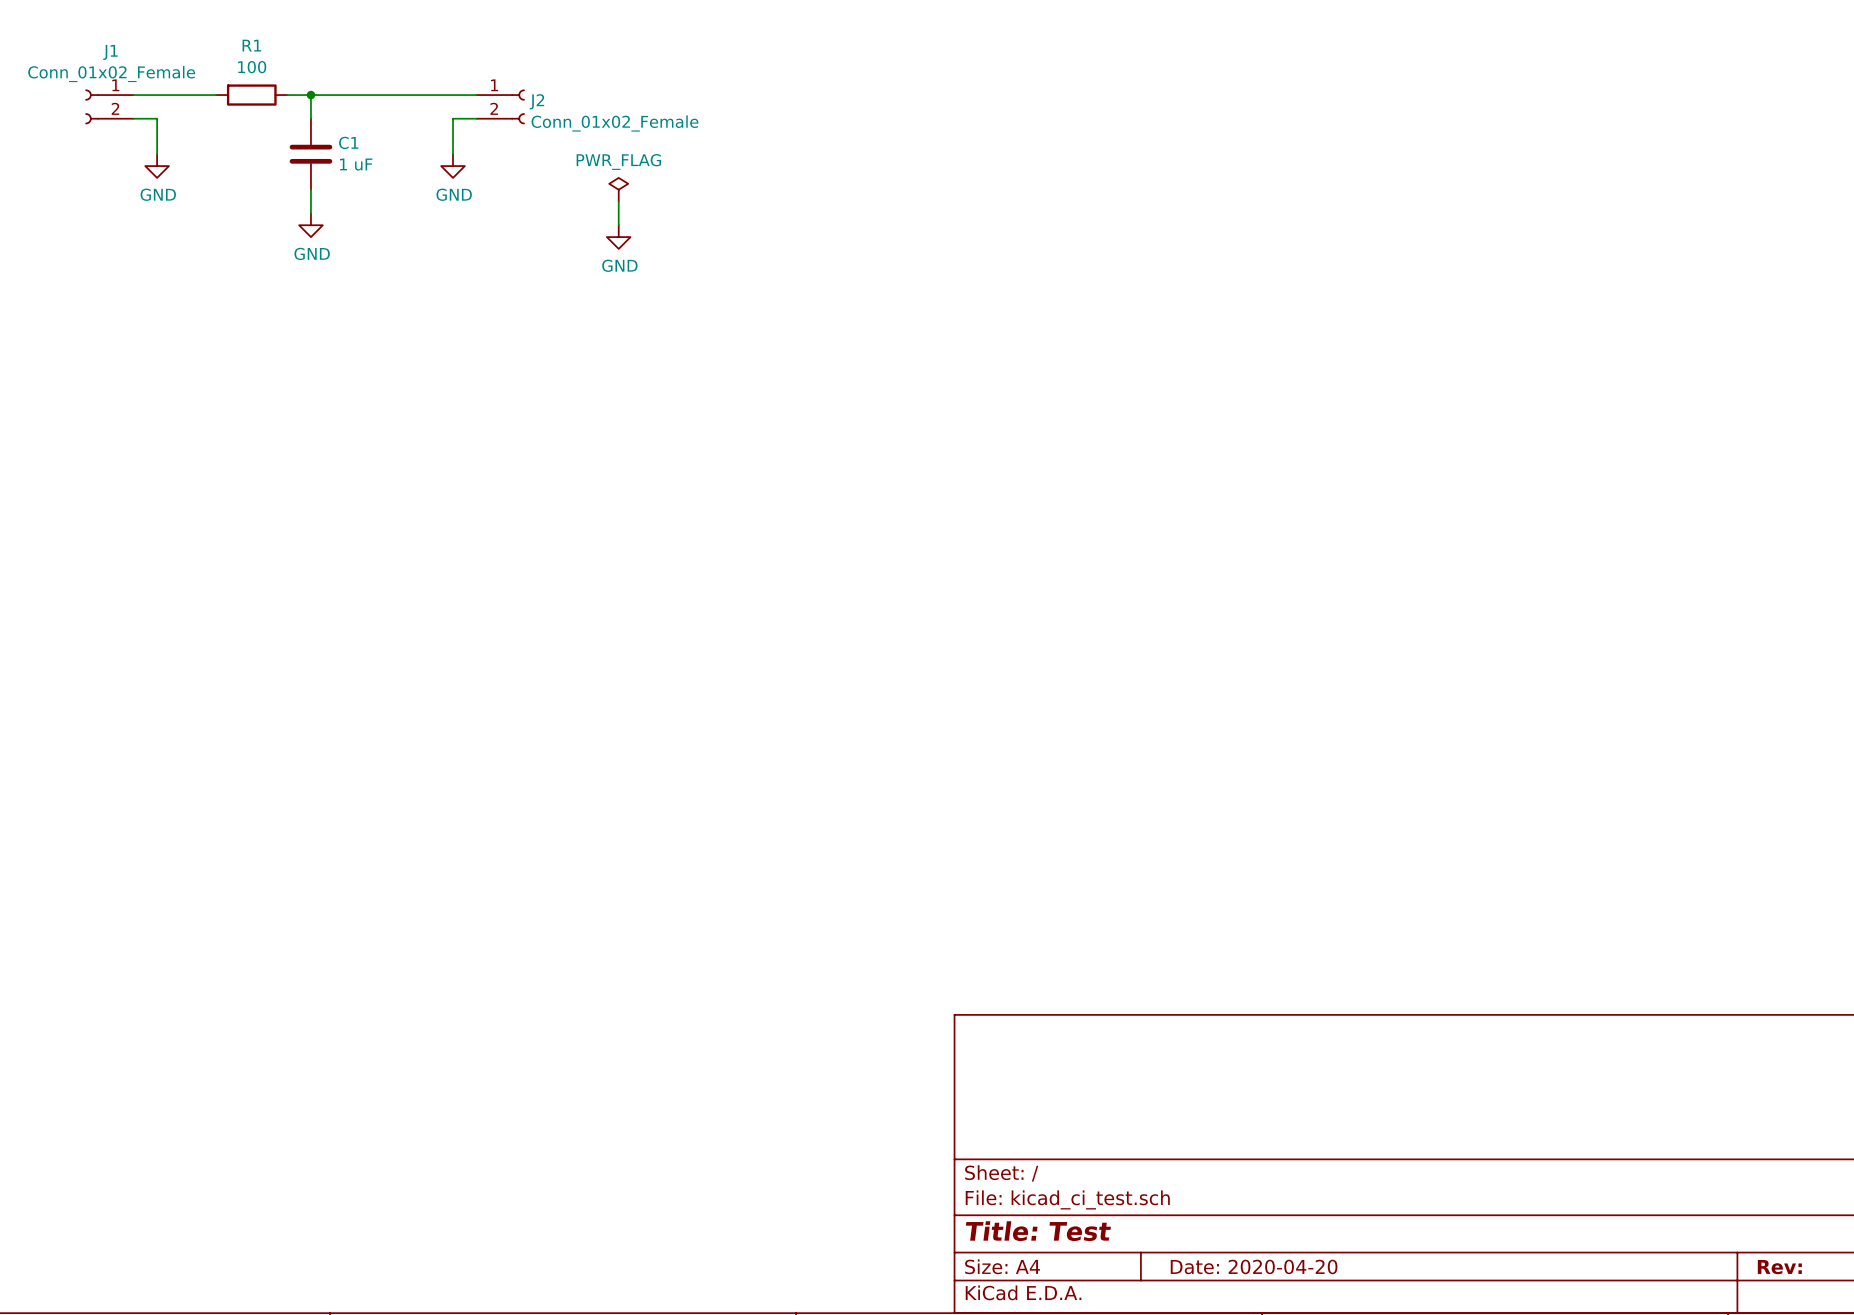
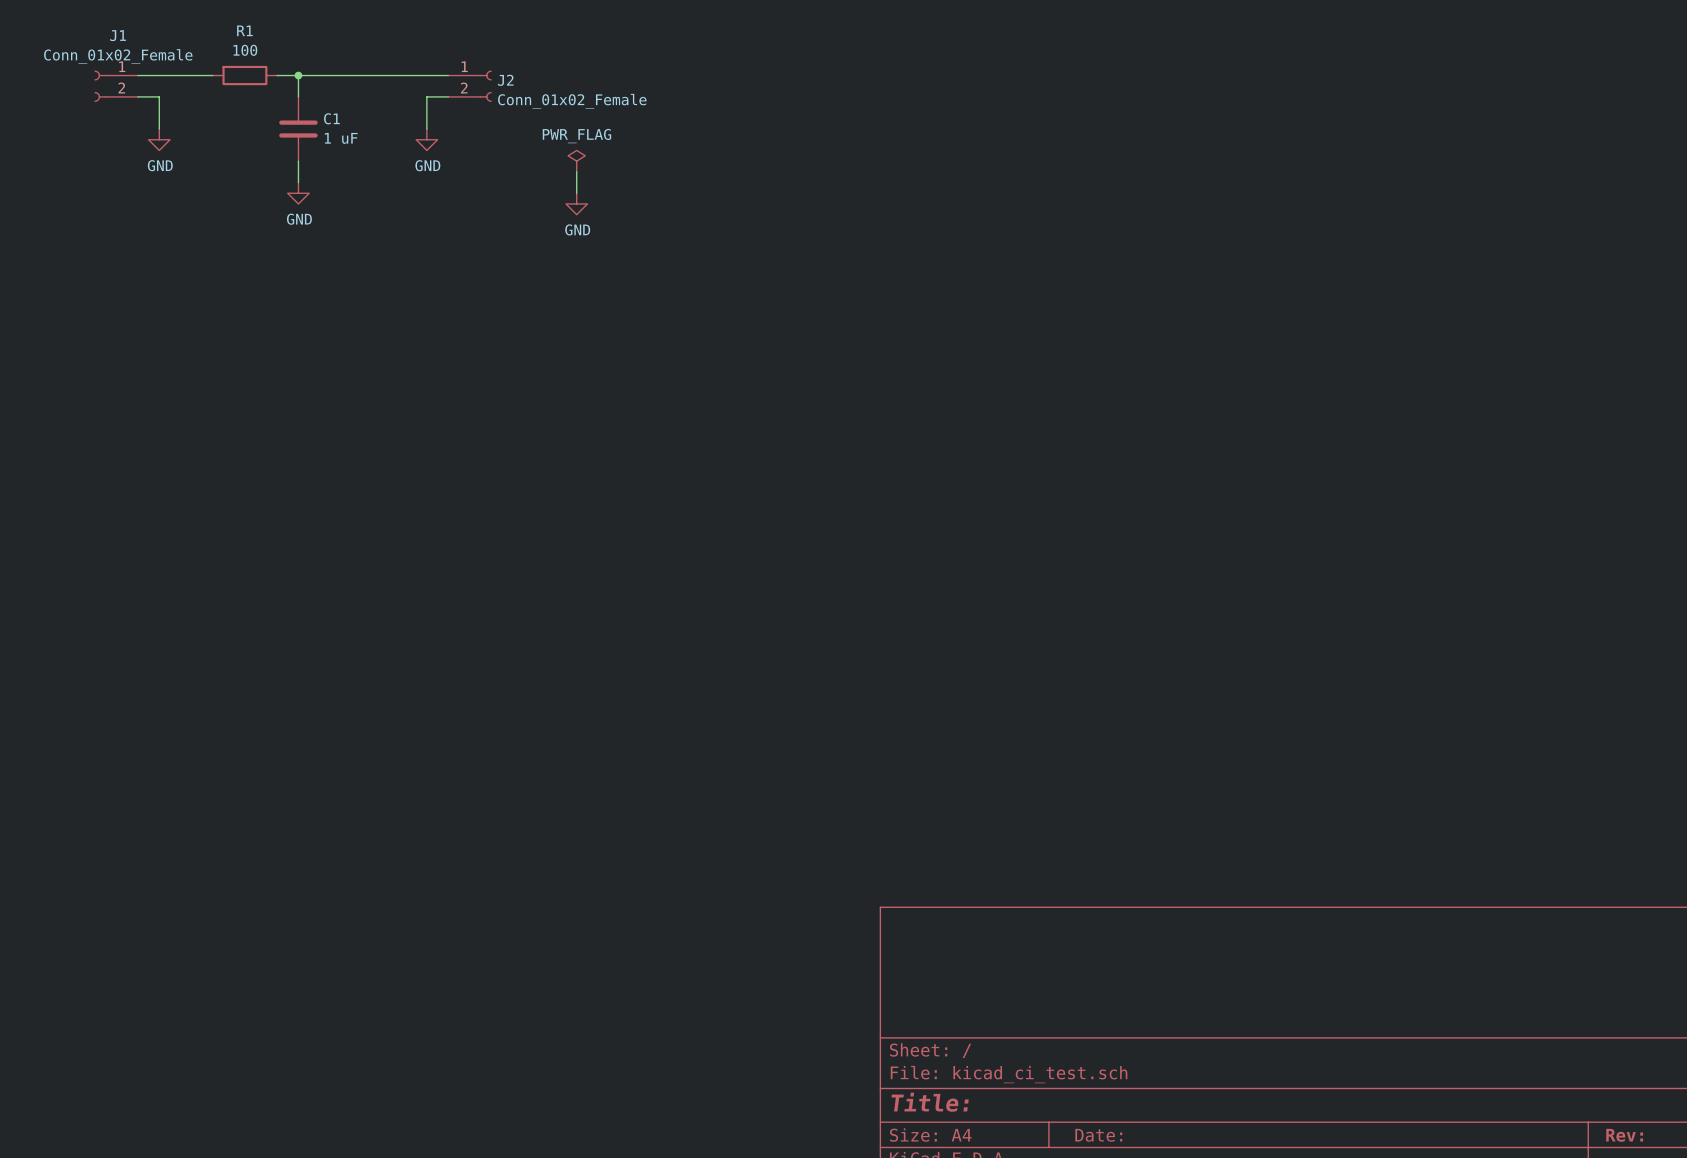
title block: Title: Test (1038, 1231) -> Title: (930, 1102)
title block: Date: 2020-04-20 (1254, 1266) -> Date: (1098, 1135)

